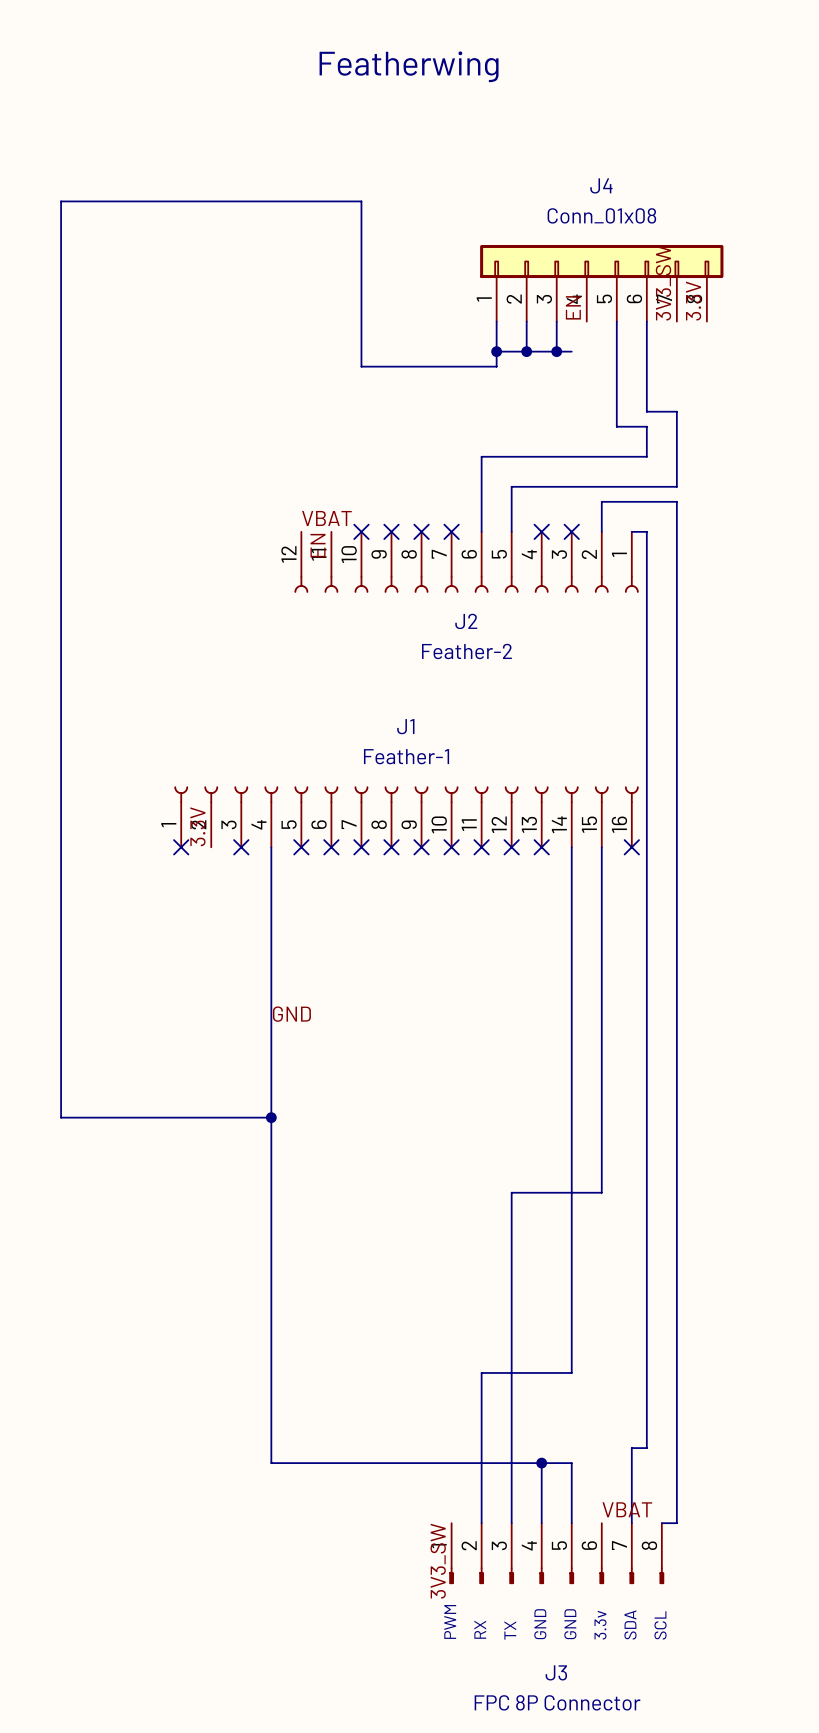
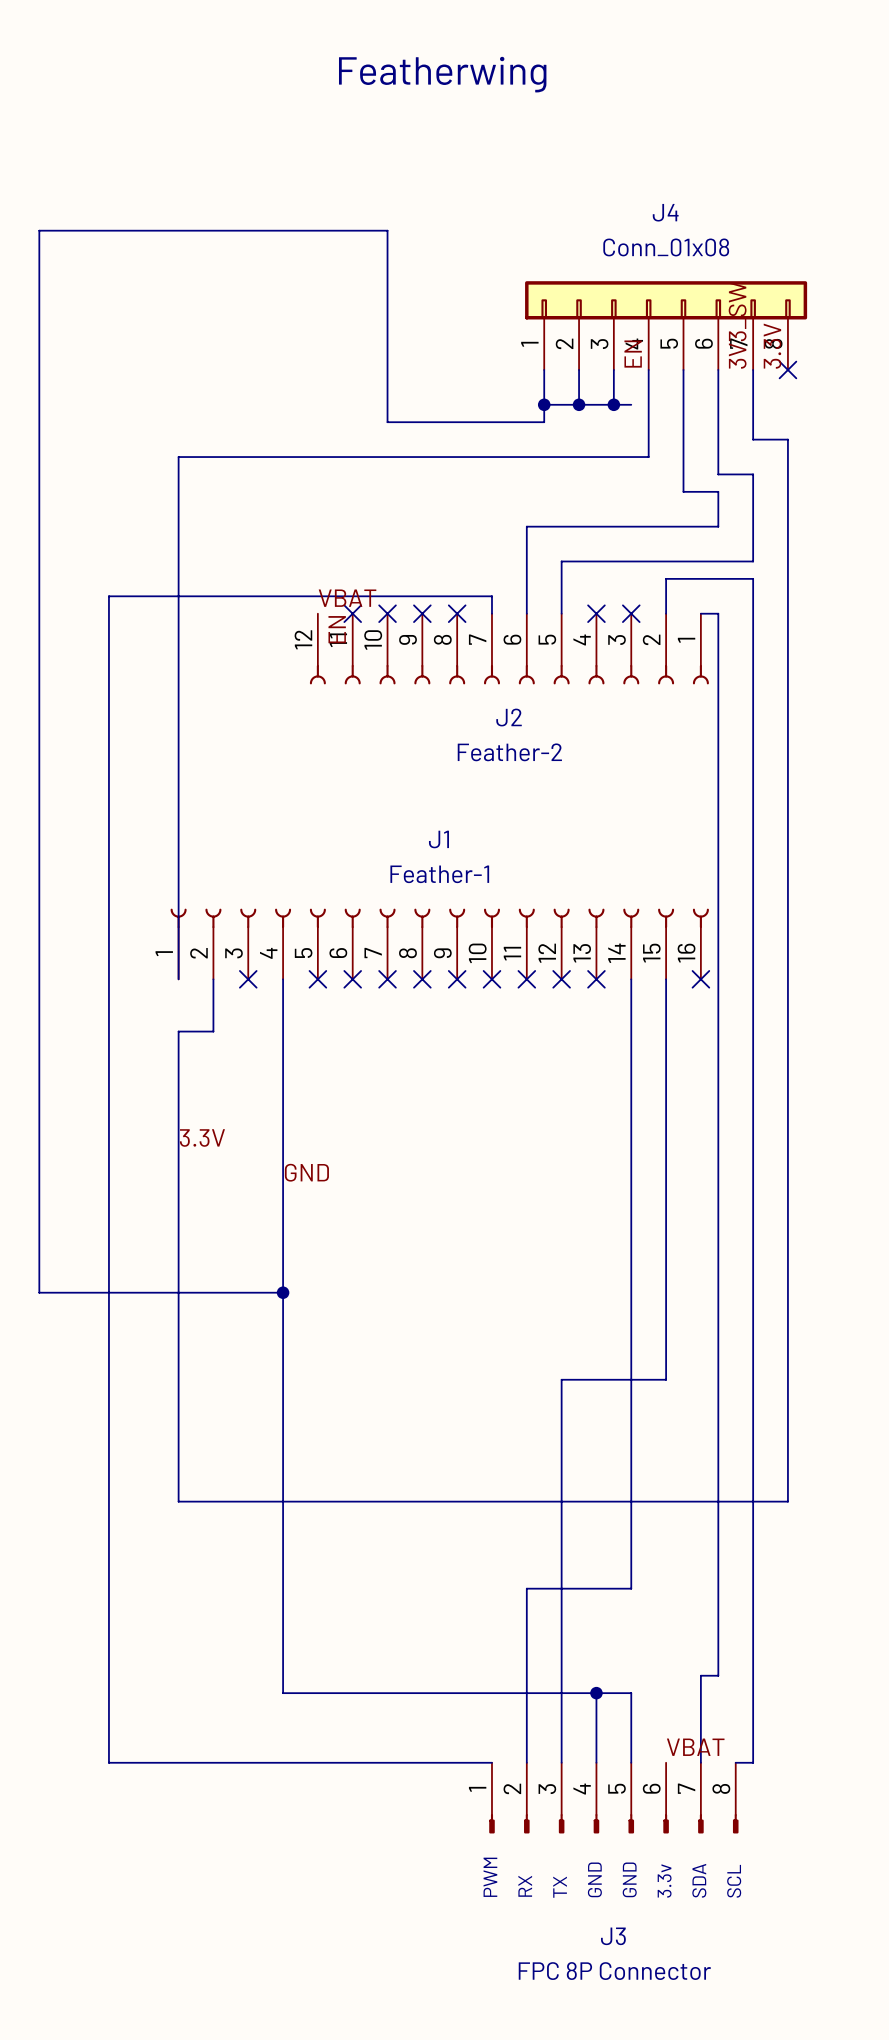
wire: none -> (648, 369) (648, 457) (178, 457) (178, 979)
wire: none -> (753, 369) (753, 439) (787, 439) (787, 1501) (178, 1501) (178, 1031) (213, 1031) (213, 979)
no-connect mark: none -> (787, 369)
no-connect mark: none -> (352, 613)
wire: none -> (491, 613) (491, 596) (108, 596) (108, 1762) (491, 1762)
no-connect mark: (451, 531) -> none
label rotation: 0° (197, 826) -> 90° clockwise (202, 1137)
label position: 3.3V (197, 826) -> 3.3V (202, 1137)
no-connect mark: (181, 847) -> none
label: 3V3_SW (438, 1561) -> none

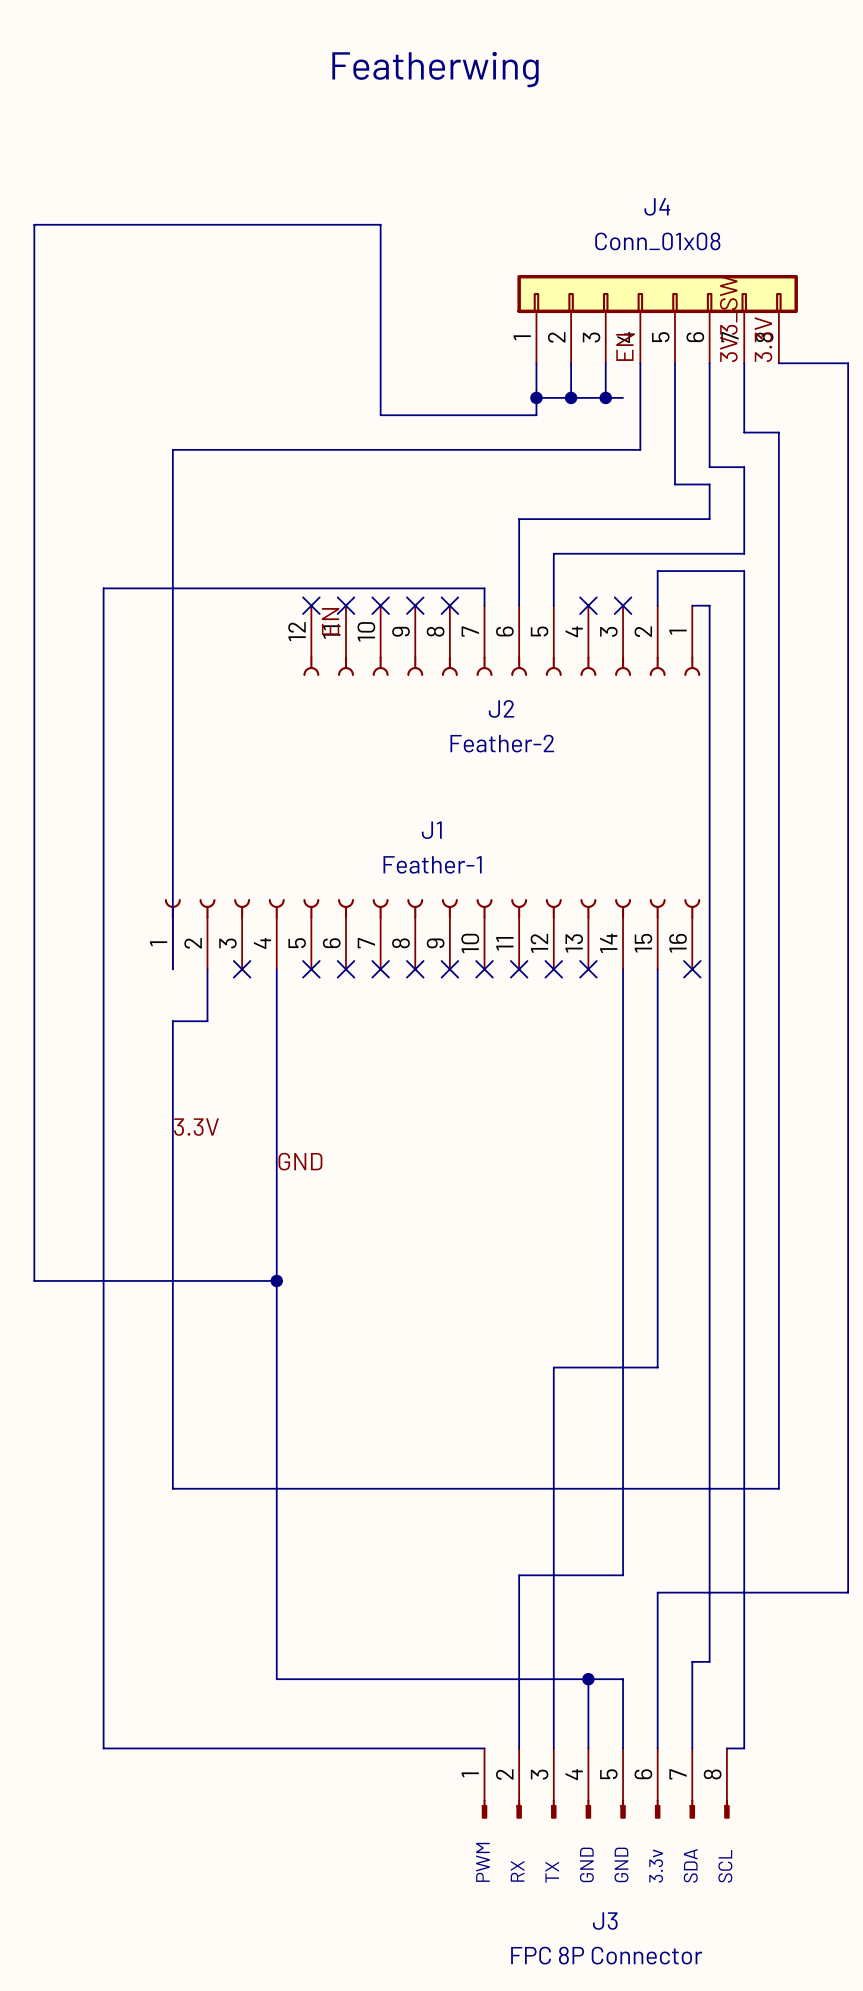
wire: none -> (778, 363) (848, 363) (848, 1592) (657, 1592) (657, 1748)
no-connect mark: (787, 369) -> none
label: VBAT (347, 598) -> none
no-connect mark: none -> (311, 605)
label: VBAT (695, 1747) -> none

